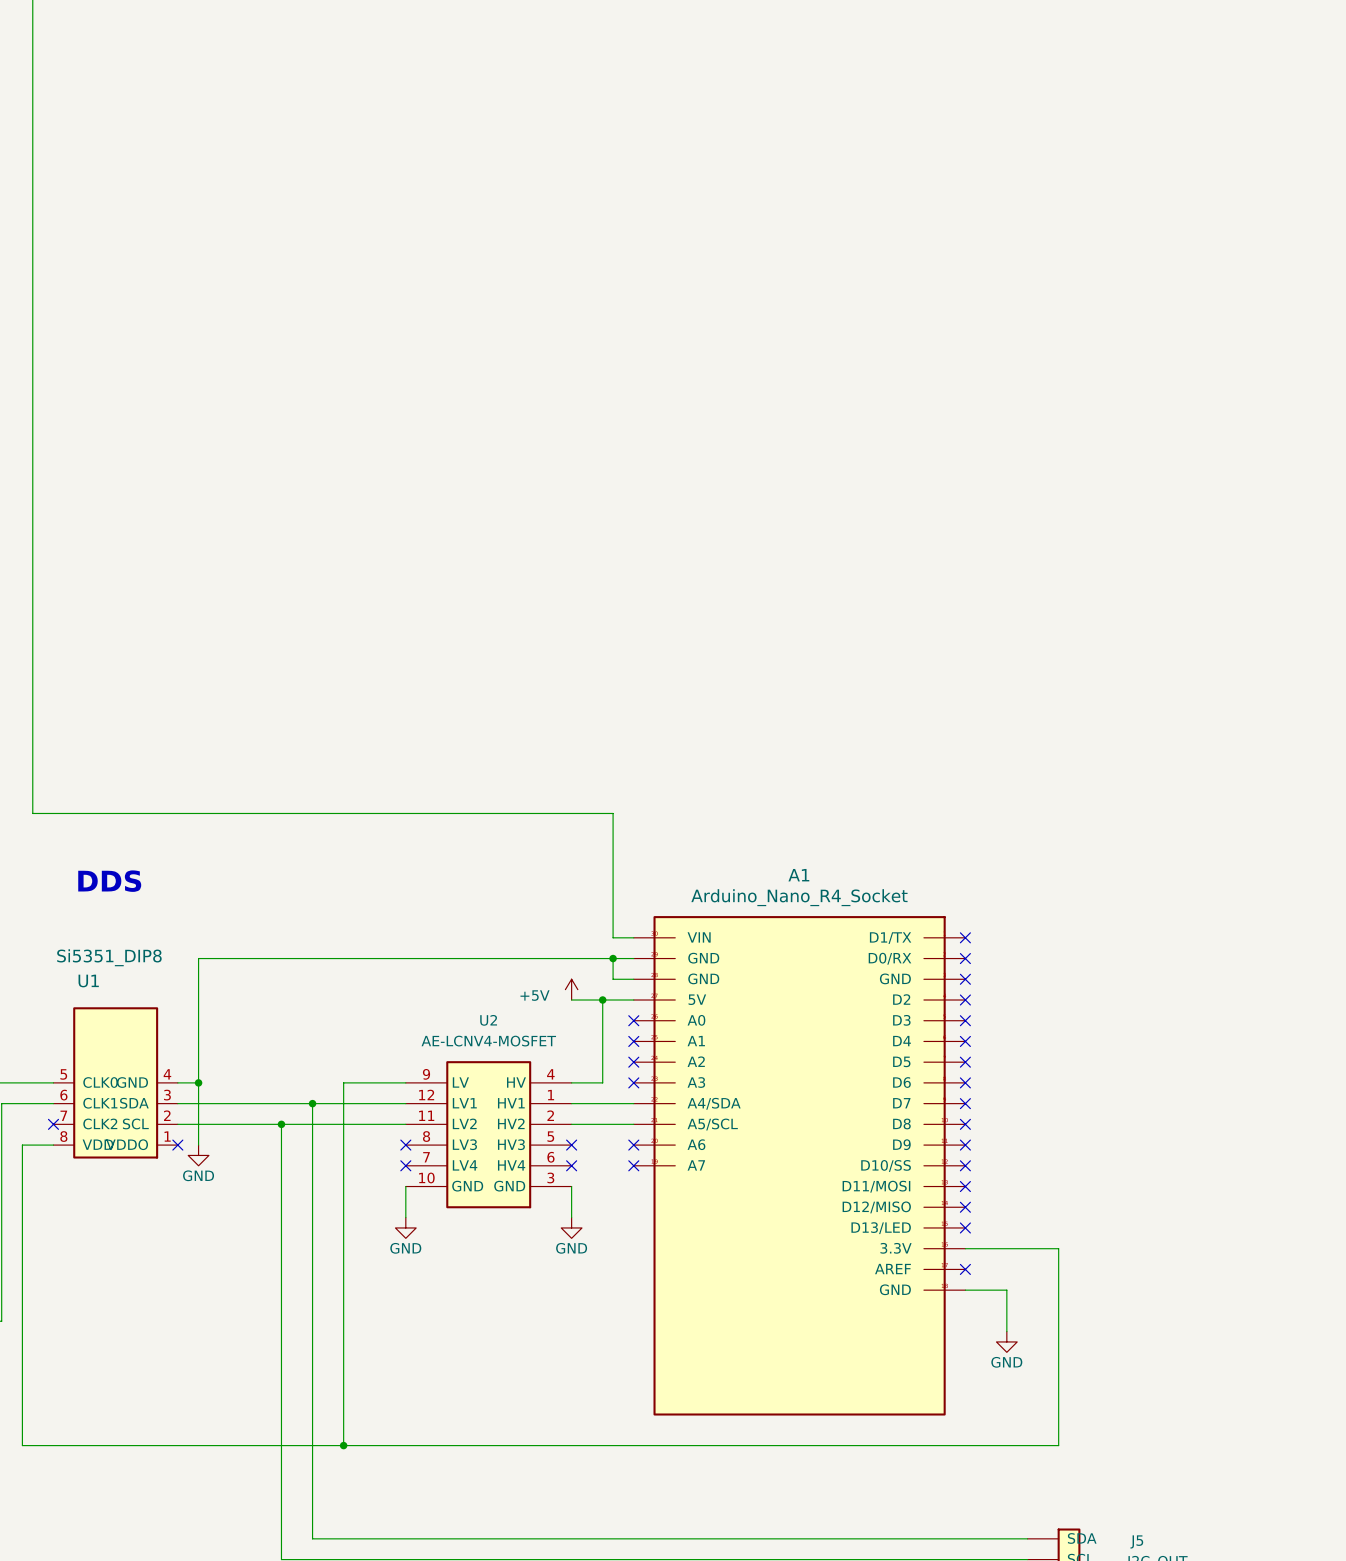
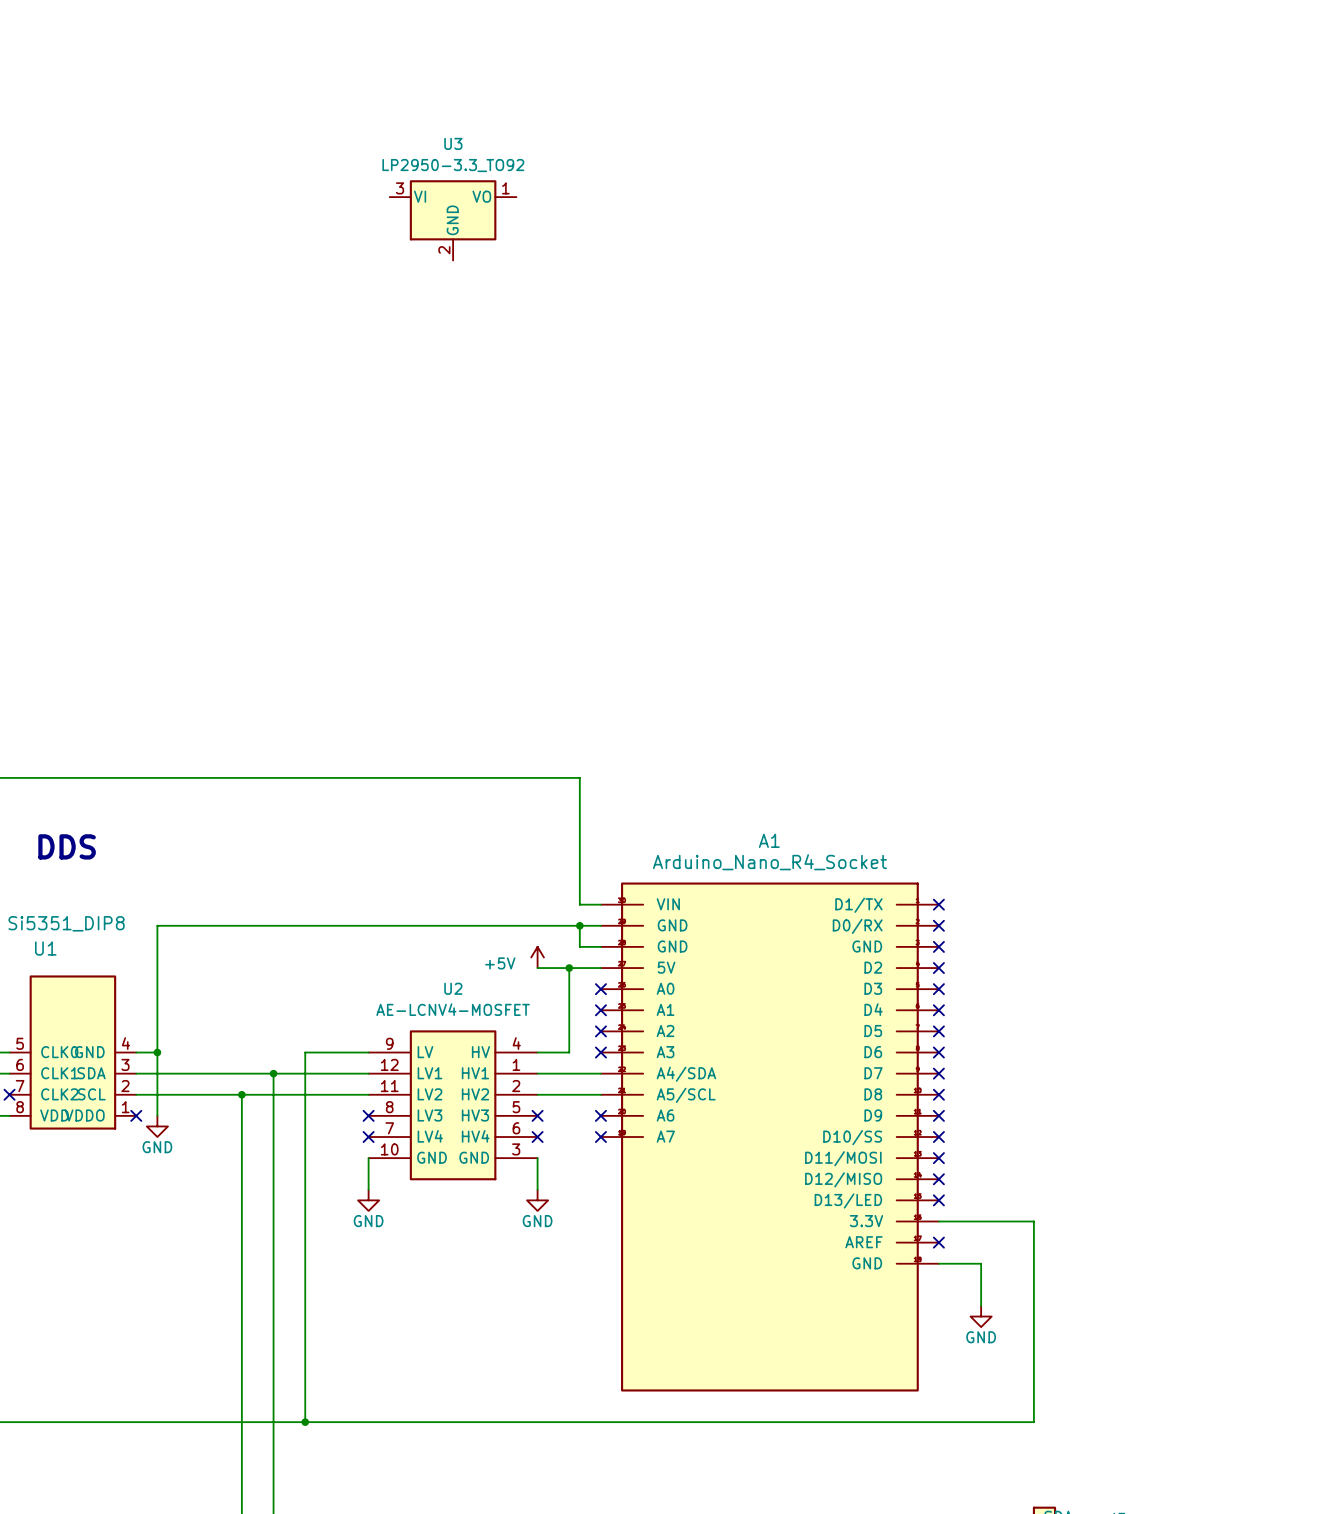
U3: none -> LP2950-3.3_TO92 (453, 220)

